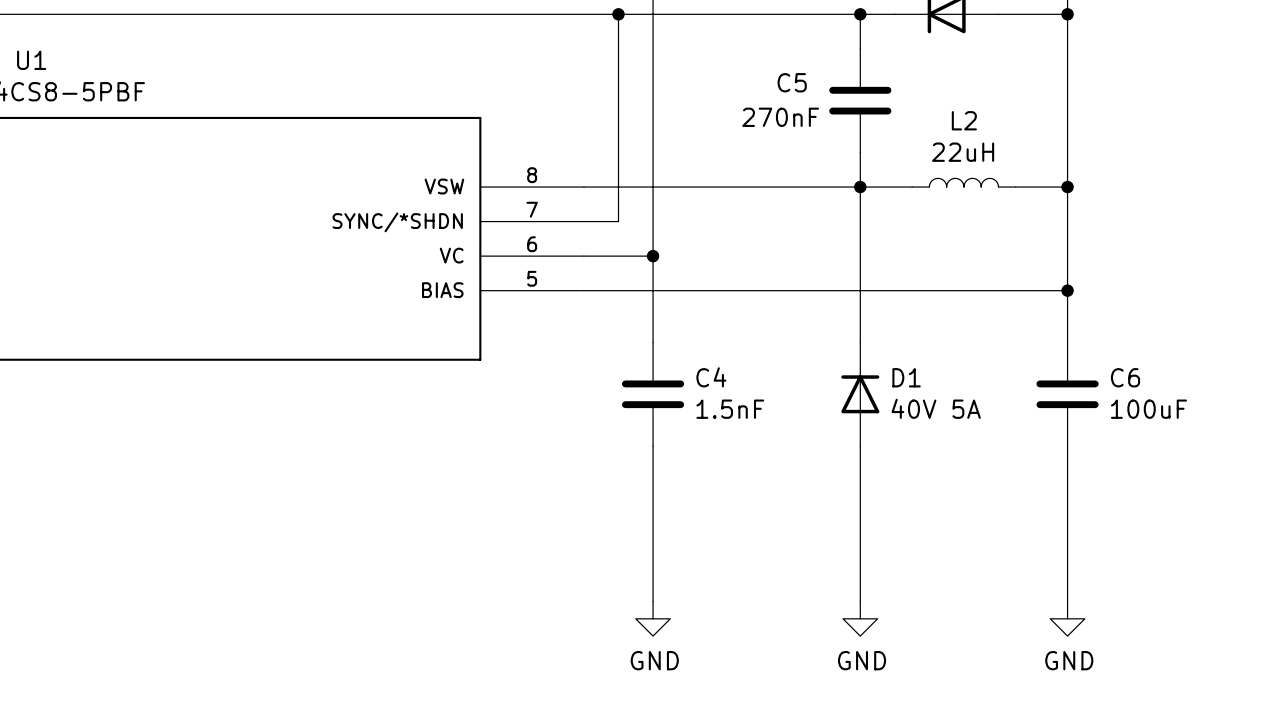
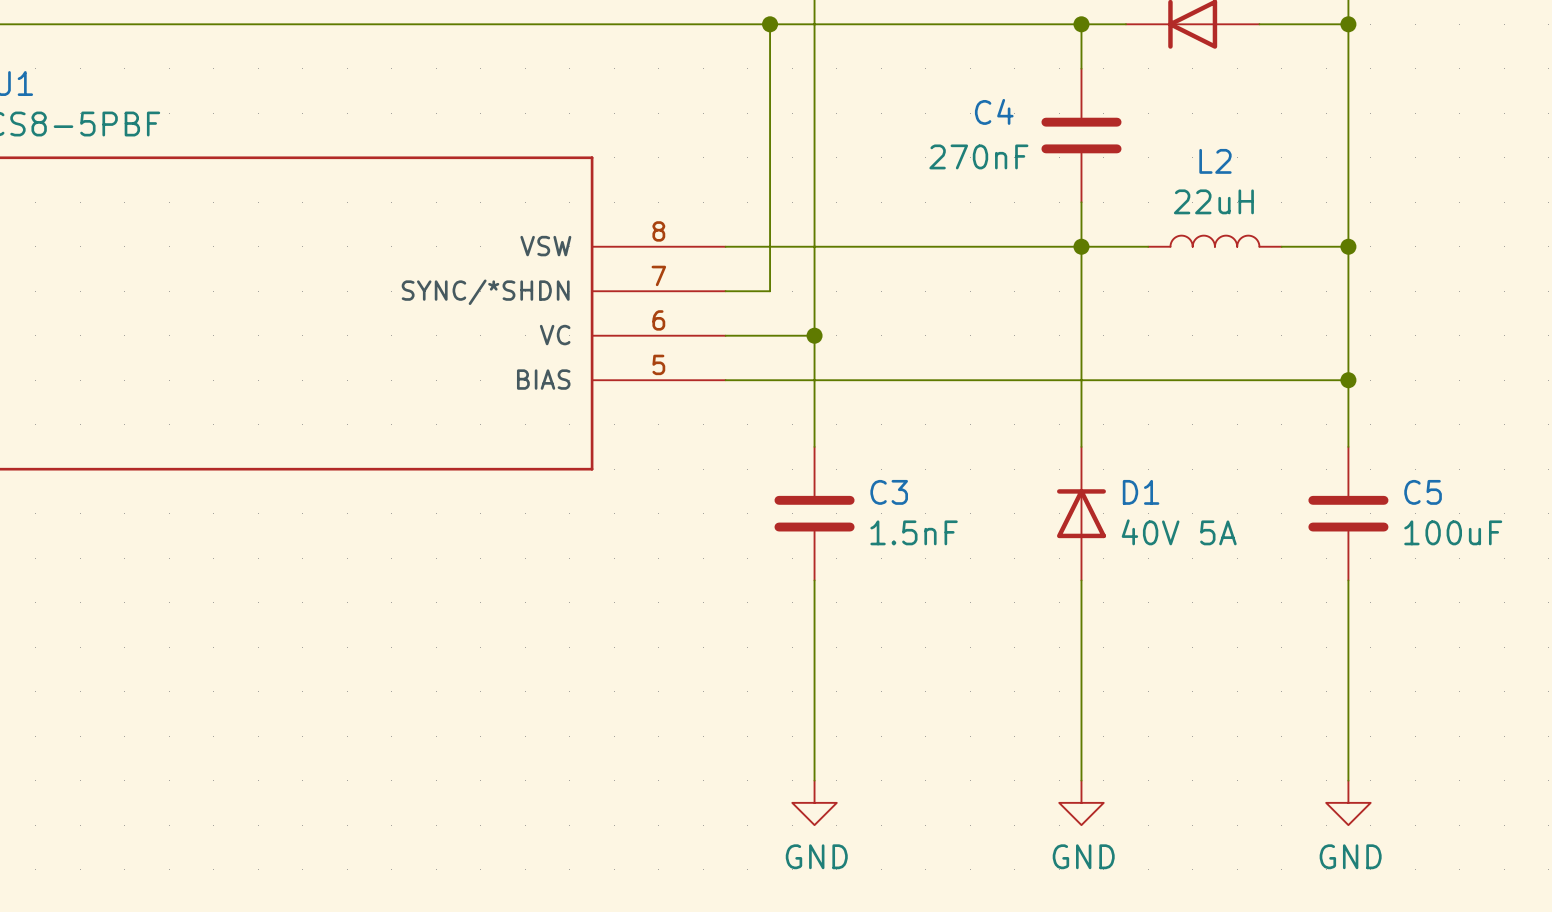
C5 name: C5 (792, 82) -> C4 (994, 111)
C4 name: C4 (711, 377) -> C3 (889, 492)
C6 name: C6 (1125, 377) -> C5 (1423, 492)

